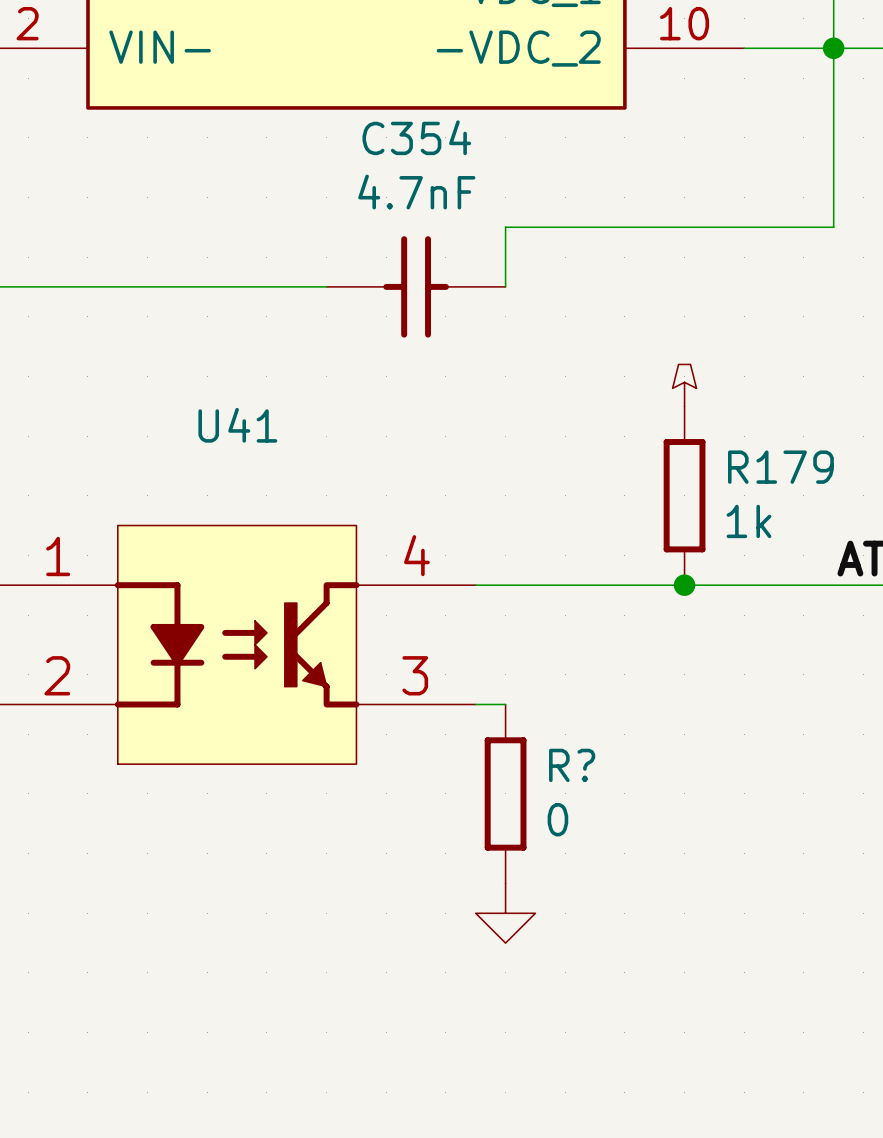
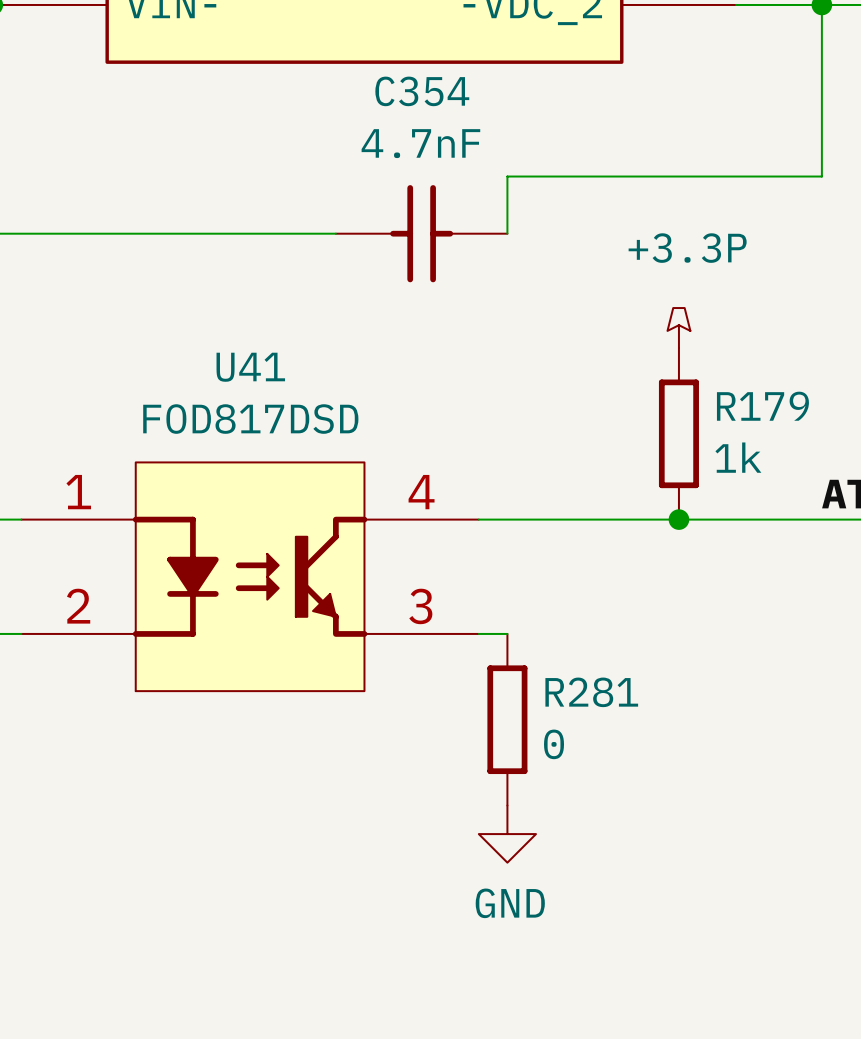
power symbol text: none -> +3.3P (687, 248)
U41 value: none -> FOD817DSD (250, 419)
R? name: R? (572, 765) -> R281 (591, 692)
power symbol text: none -> GND (510, 903)

